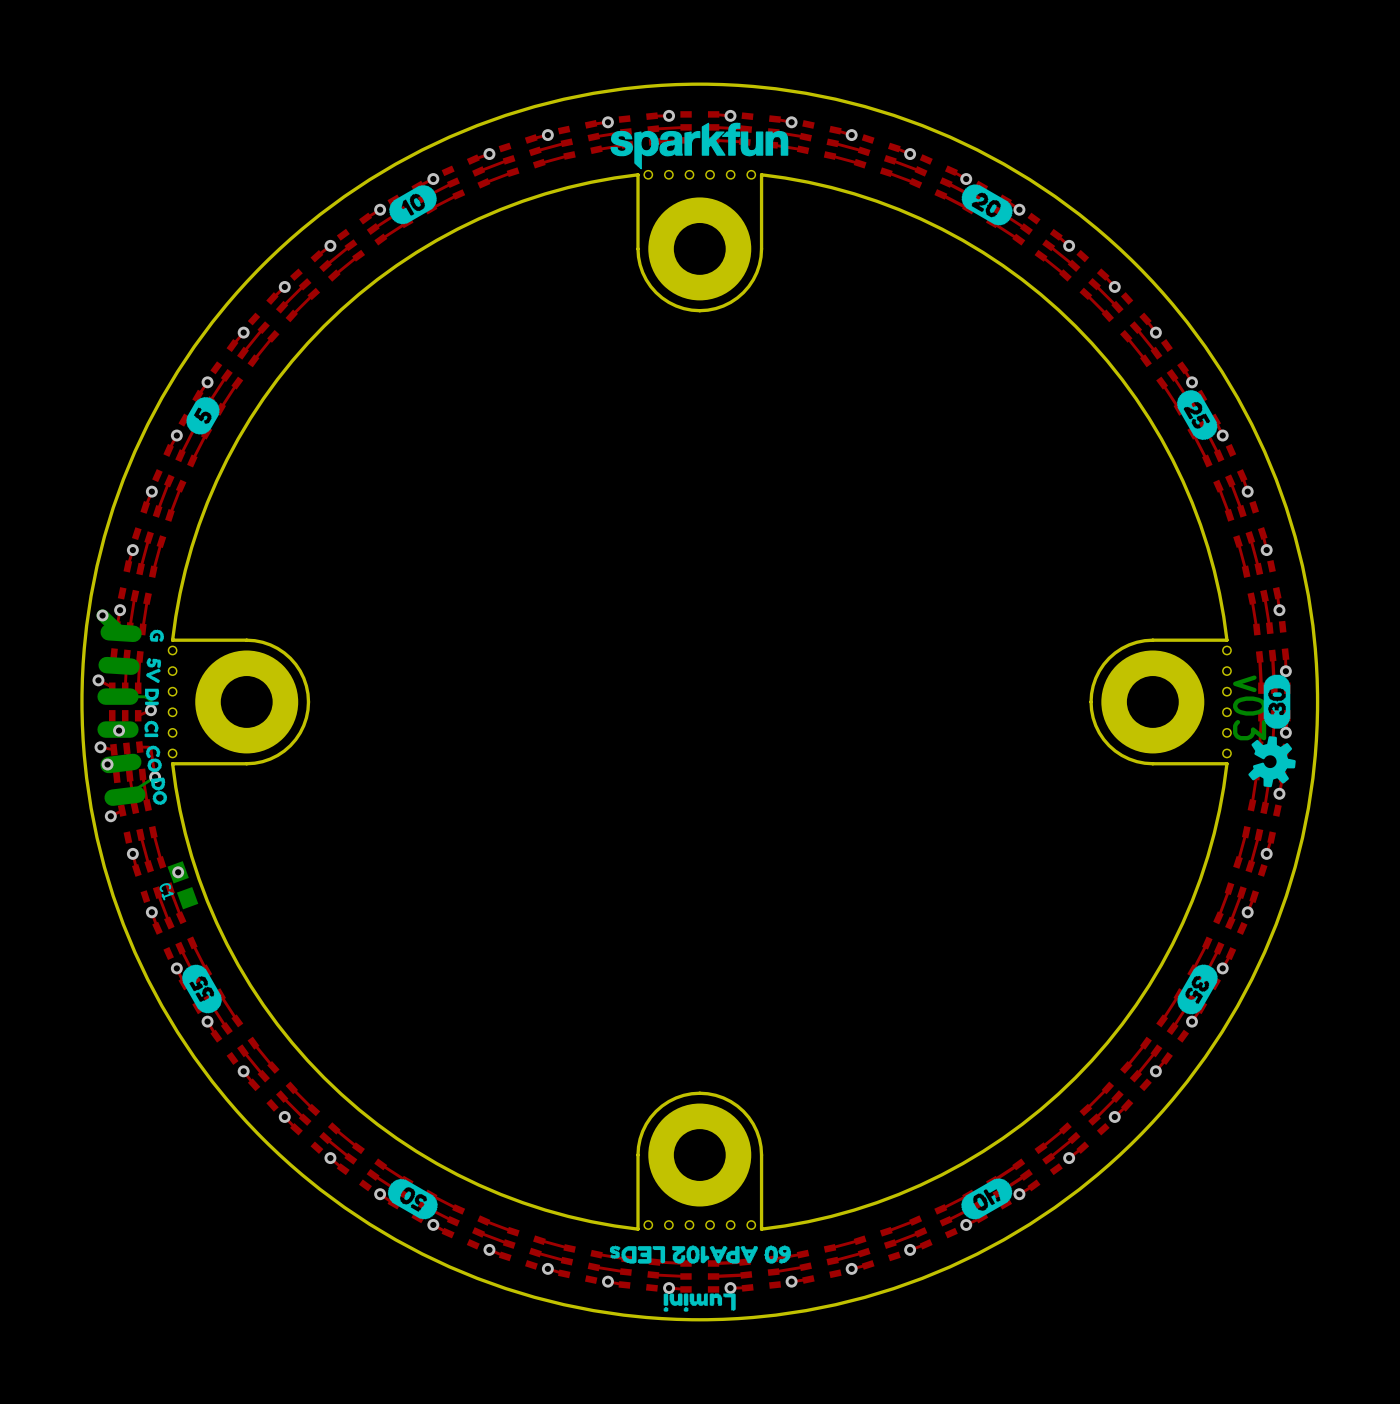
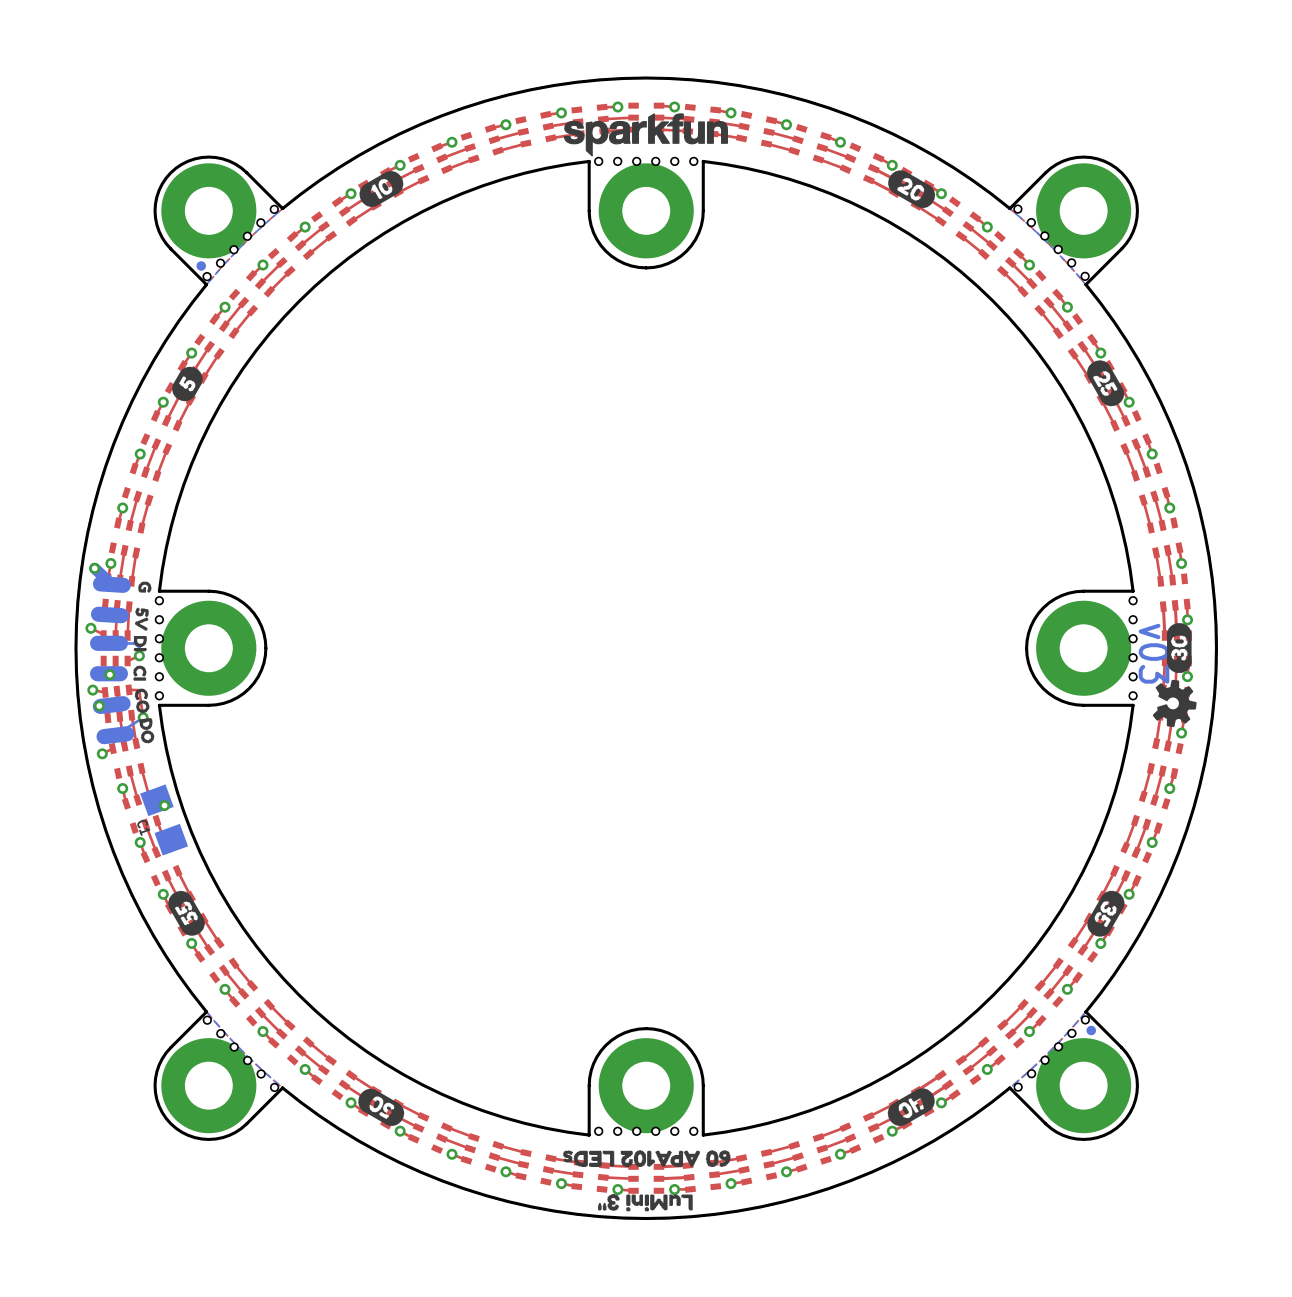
round board edge: [80, 82, 1320, 1322] -> none
board edge: none -> (1045, 172) (1009, 208) (972, 180) (933, 155) (892, 133) (850, 115) (806, 100) (761, 89) (692, 79) (646, 78) (599, 79) (531, 89) (486, 100) (442, 115) (399, 133) (358, 155) (319, 180) (282, 208) (241, 168) (222, 158) (208, 157) (194, 158) (181, 164) (170, 172) (162, 183) (156, 196) (155, 210) (156, 224) (166, 243) (206, 284) (178, 321) (153, 360) (131, 401) (113, 444) (98, 488) (87, 533) (77, 601) (75, 648) (77, 694) (87, 763) (98, 808) (113, 852) (131, 894) (153, 935) (178, 974) (206, 1011) (166, 1052) (156, 1071) (155, 1085) (156, 1099) (162, 1112) (170, 1123) (181, 1132) (194, 1137) (208, 1139) (222, 1137) (241, 1128) (282, 1087) (319, 1115) (358, 1140) (399, 1162) (442, 1180) (486, 1195) (531, 1206) (599, 1216) (646, 1218) (692, 1216) (761, 1206) (806, 1195) (850, 1180) (892, 1162) (933, 1140) (972, 1115) (1009, 1087) (1050, 1128) (1069, 1137) (1083, 1139) (1097, 1137) (1110, 1132) (1121, 1123) (1130, 1112) (1135, 1099) (1137, 1085) (1135, 1071) (1126, 1052) (1085, 1011) (1113, 974) (1138, 935) (1160, 894) (1186, 830) (1199, 785) (1212, 717) (1216, 648) (1214, 601) (1208, 555) (1199, 510) (1186, 466) (1170, 422) (1138, 360) (1113, 321) (1085, 284) (1130, 237) (1136, 217) (1136, 203) (1133, 190) (1126, 178) (1116, 168) (1104, 161) (1090, 157) (1076, 157) (1063, 161) (1045, 172)
hole: none -> (274, 209)
hole: none -> (1017, 209)
part: none -> (208, 210)
board edge: (761, 228) (759, 264) (748, 286) (730, 302) (715, 308) (699, 310) (683, 308) (668, 302) (650, 286) (640, 264) (637, 228) -> (703, 210) (698, 232) (686, 251) (668, 263) (646, 267) (624, 263) (605, 251) (593, 232) (589, 210)
part: none -> (1083, 210)
hole: none -> (1031, 222)
hole: none -> (260, 222)
part position: (699, 248) -> (646, 210)
hole: none -> (247, 236)
hole: none -> (1044, 236)
hole: none -> (233, 249)
hole: none -> (1058, 249)
hole: none -> (220, 263)
hole: none -> (1071, 262)
part: none -> (201, 266)
hole: none -> (207, 276)
hole: none -> (1085, 276)
board edge: (226, 640) (262, 642) (284, 652) (300, 671) (306, 685) (308, 701) (306, 717) (300, 732) (284, 750) (262, 761) (226, 763) -> (208, 591) (230, 595) (249, 607) (261, 626) (265, 648) (261, 670) (249, 688) (230, 700) (208, 705)
board edge: (1173, 640) (1136, 642) (1115, 652) (1099, 671) (1093, 685) (1091, 701) (1093, 717) (1099, 732) (1115, 750) (1136, 761) (1173, 763) -> (1083, 591) (1061, 595) (1043, 607) (1030, 626) (1026, 648) (1030, 670) (1043, 688) (1061, 700) (1083, 705)
part position: (246, 701) -> (208, 648)
part position: (1152, 701) -> (1083, 648)
C1 footprint: [167, 861, 199, 910] -> [140, 784, 189, 856]
hole: none -> (207, 1020)
hole: none -> (1085, 1019)
part: none -> (1091, 1030)
hole: none -> (1071, 1033)
hole: none -> (220, 1033)
hole: none -> (234, 1047)
hole: none -> (1058, 1046)
hole: none -> (247, 1060)
hole: none -> (1045, 1060)
part position: (699, 1155) -> (646, 1085)
hole: none -> (261, 1073)
hole: none -> (1031, 1073)
part: none -> (208, 1085)
board edge: (761, 1175) (759, 1139) (748, 1117) (730, 1101) (715, 1095) (699, 1093) (683, 1095) (668, 1101) (650, 1117) (640, 1139) (637, 1175) -> (703, 1085) (698, 1063) (686, 1045) (668, 1032) (646, 1028) (624, 1032) (605, 1045) (593, 1063) (589, 1085)
part: none -> (1083, 1085)
hole: none -> (274, 1087)
hole: none -> (1018, 1087)
drawing shape: [663, 1293, 736, 1312] -> [598, 1193, 693, 1212]

